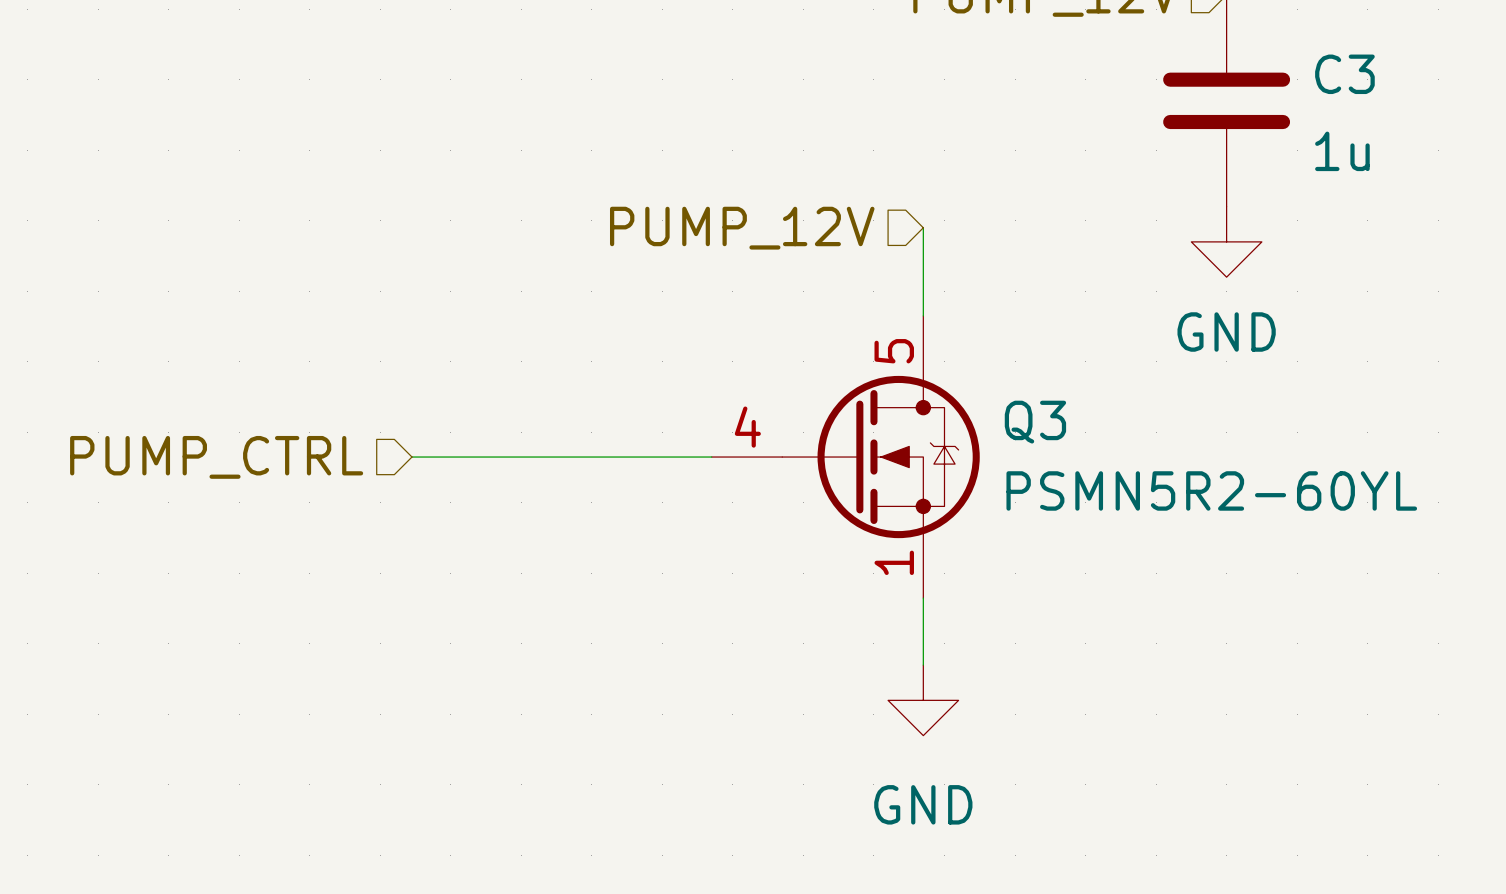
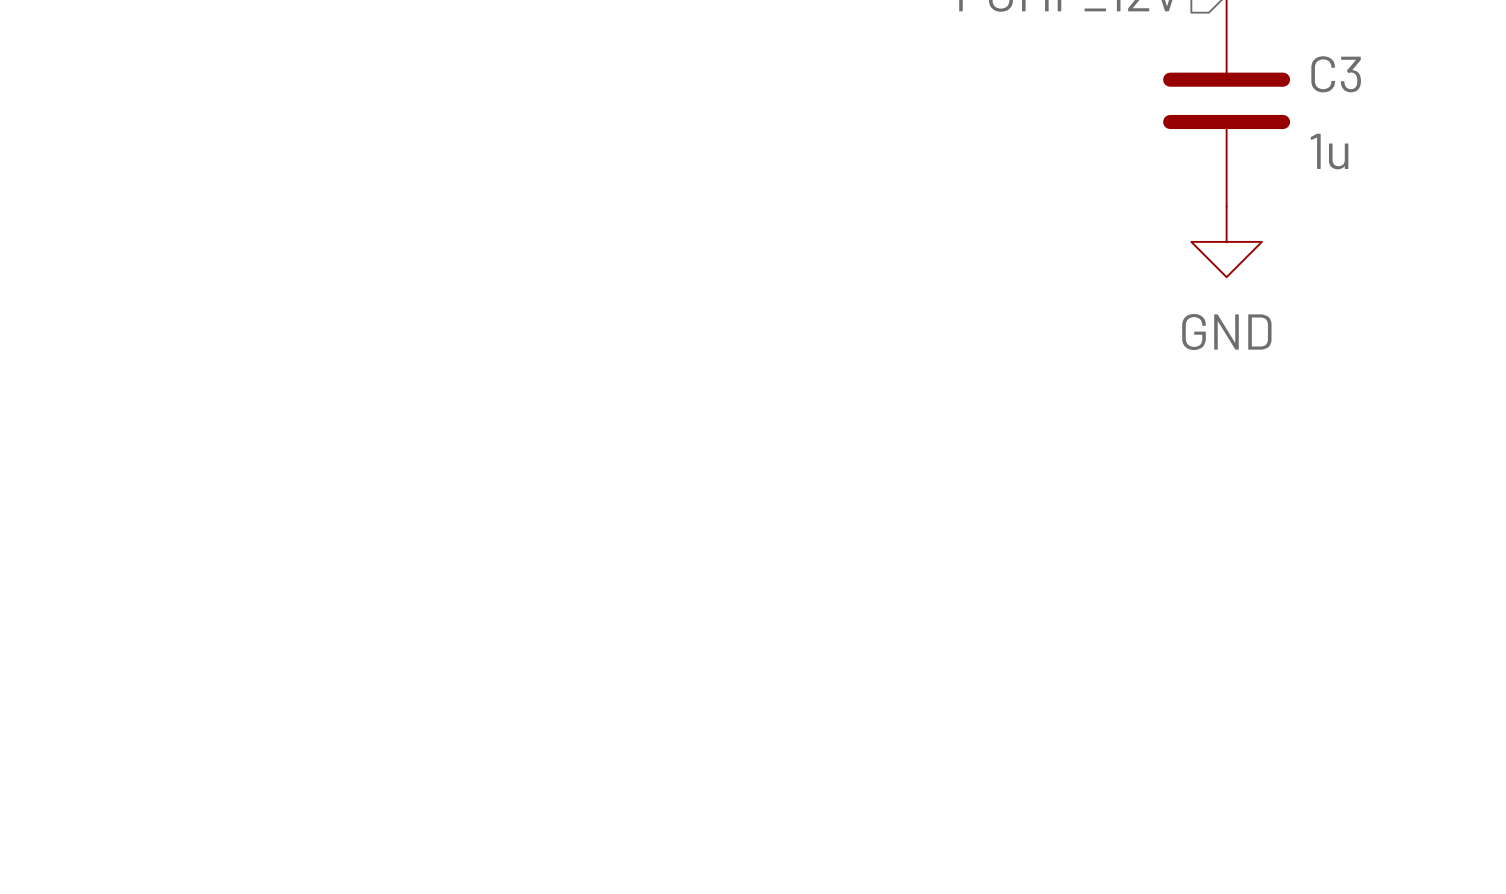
wire: (923, 227) (923, 315) -> none
hierarchical label: PUMP_12V (742, 228) -> none
hierarchical label: PUMP_CTRL (216, 457) -> none
wire: (411, 457) (711, 457) -> none
Q3: PSMN5R2-60YL (845, 457) -> none
wire: (923, 598) (923, 665) -> none
power symbol: GND (923, 700) -> none

